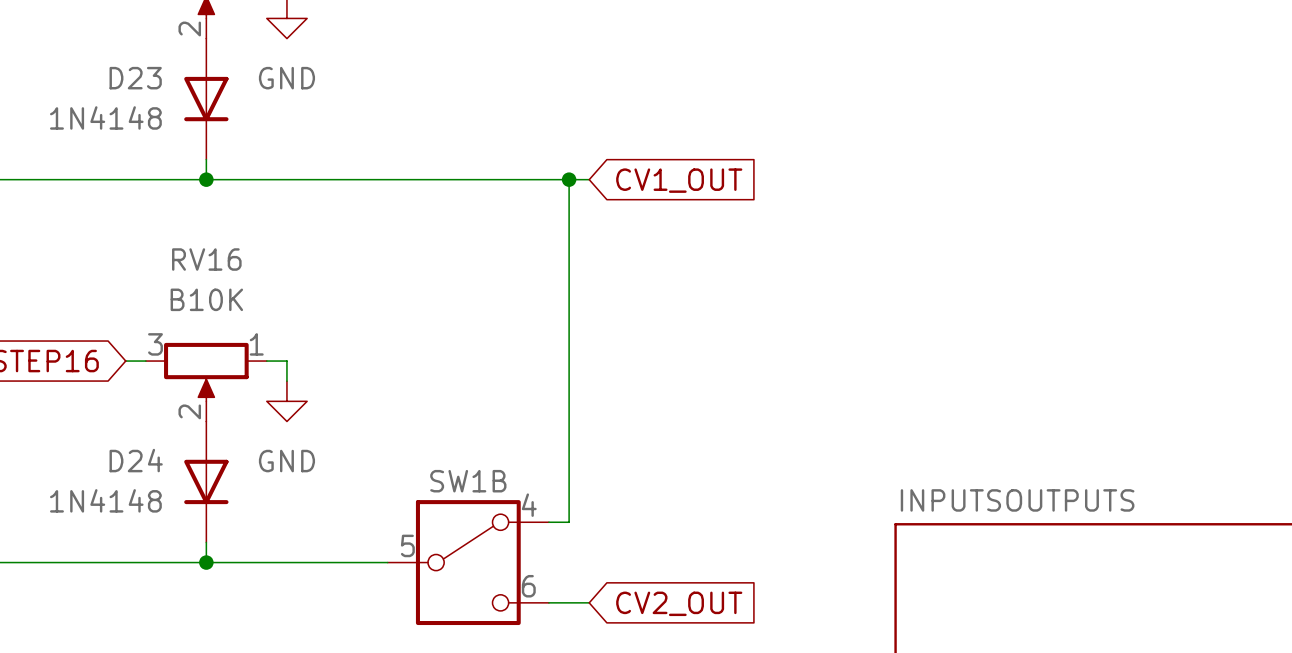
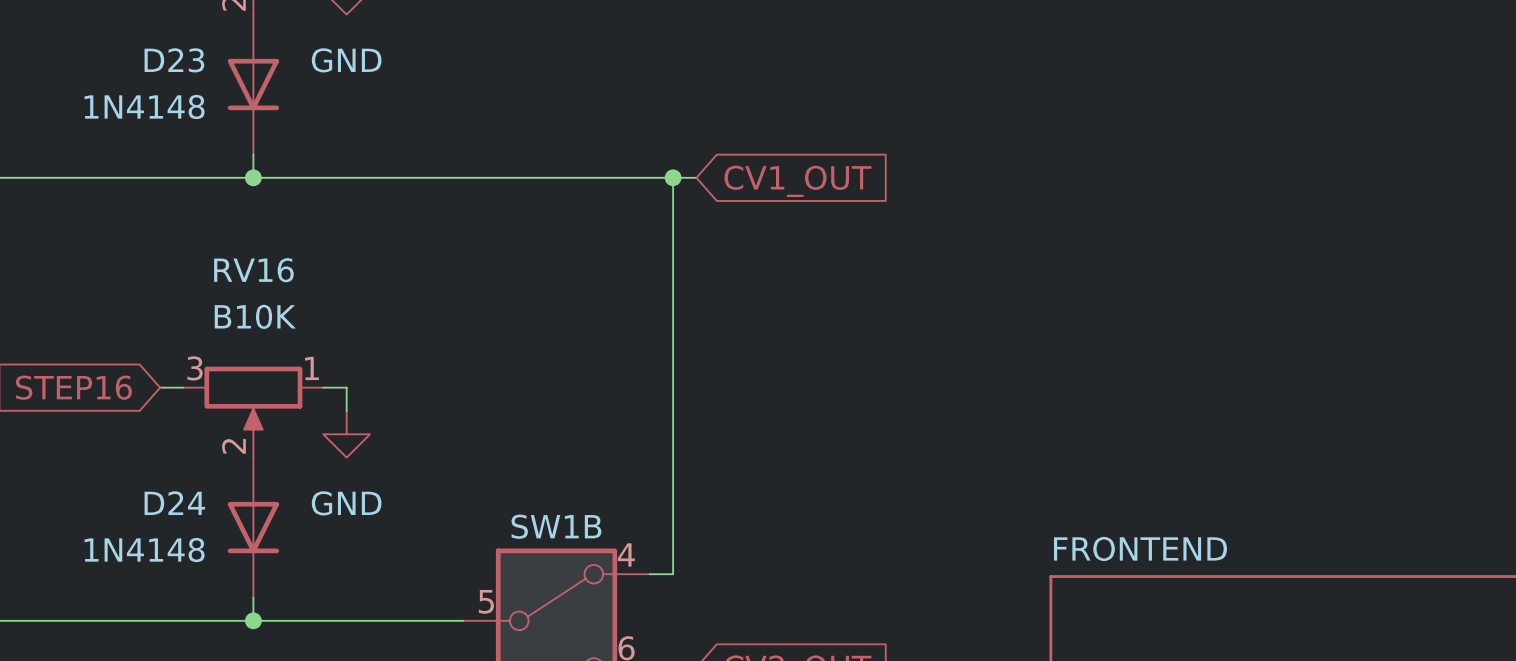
sheet INPUTSOUTPUTS name: INPUTSOUTPUTS (1017, 500) -> FRONTEND (1140, 548)

